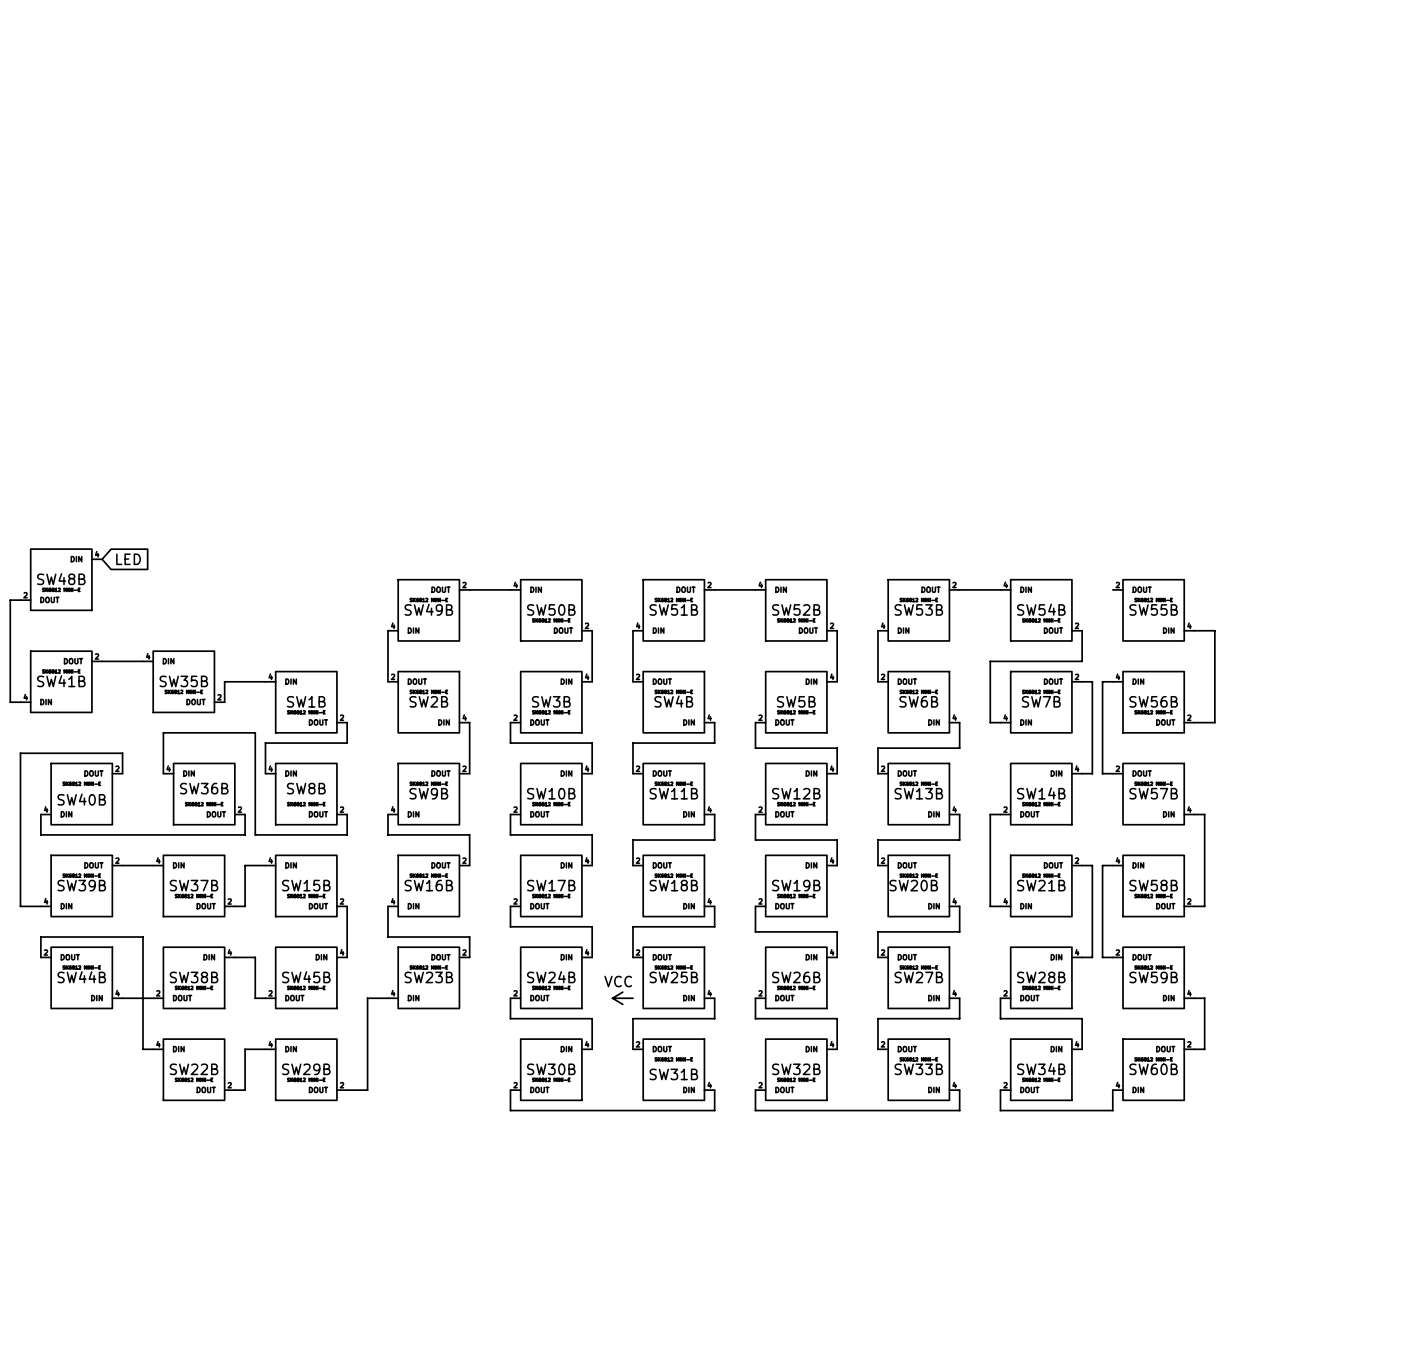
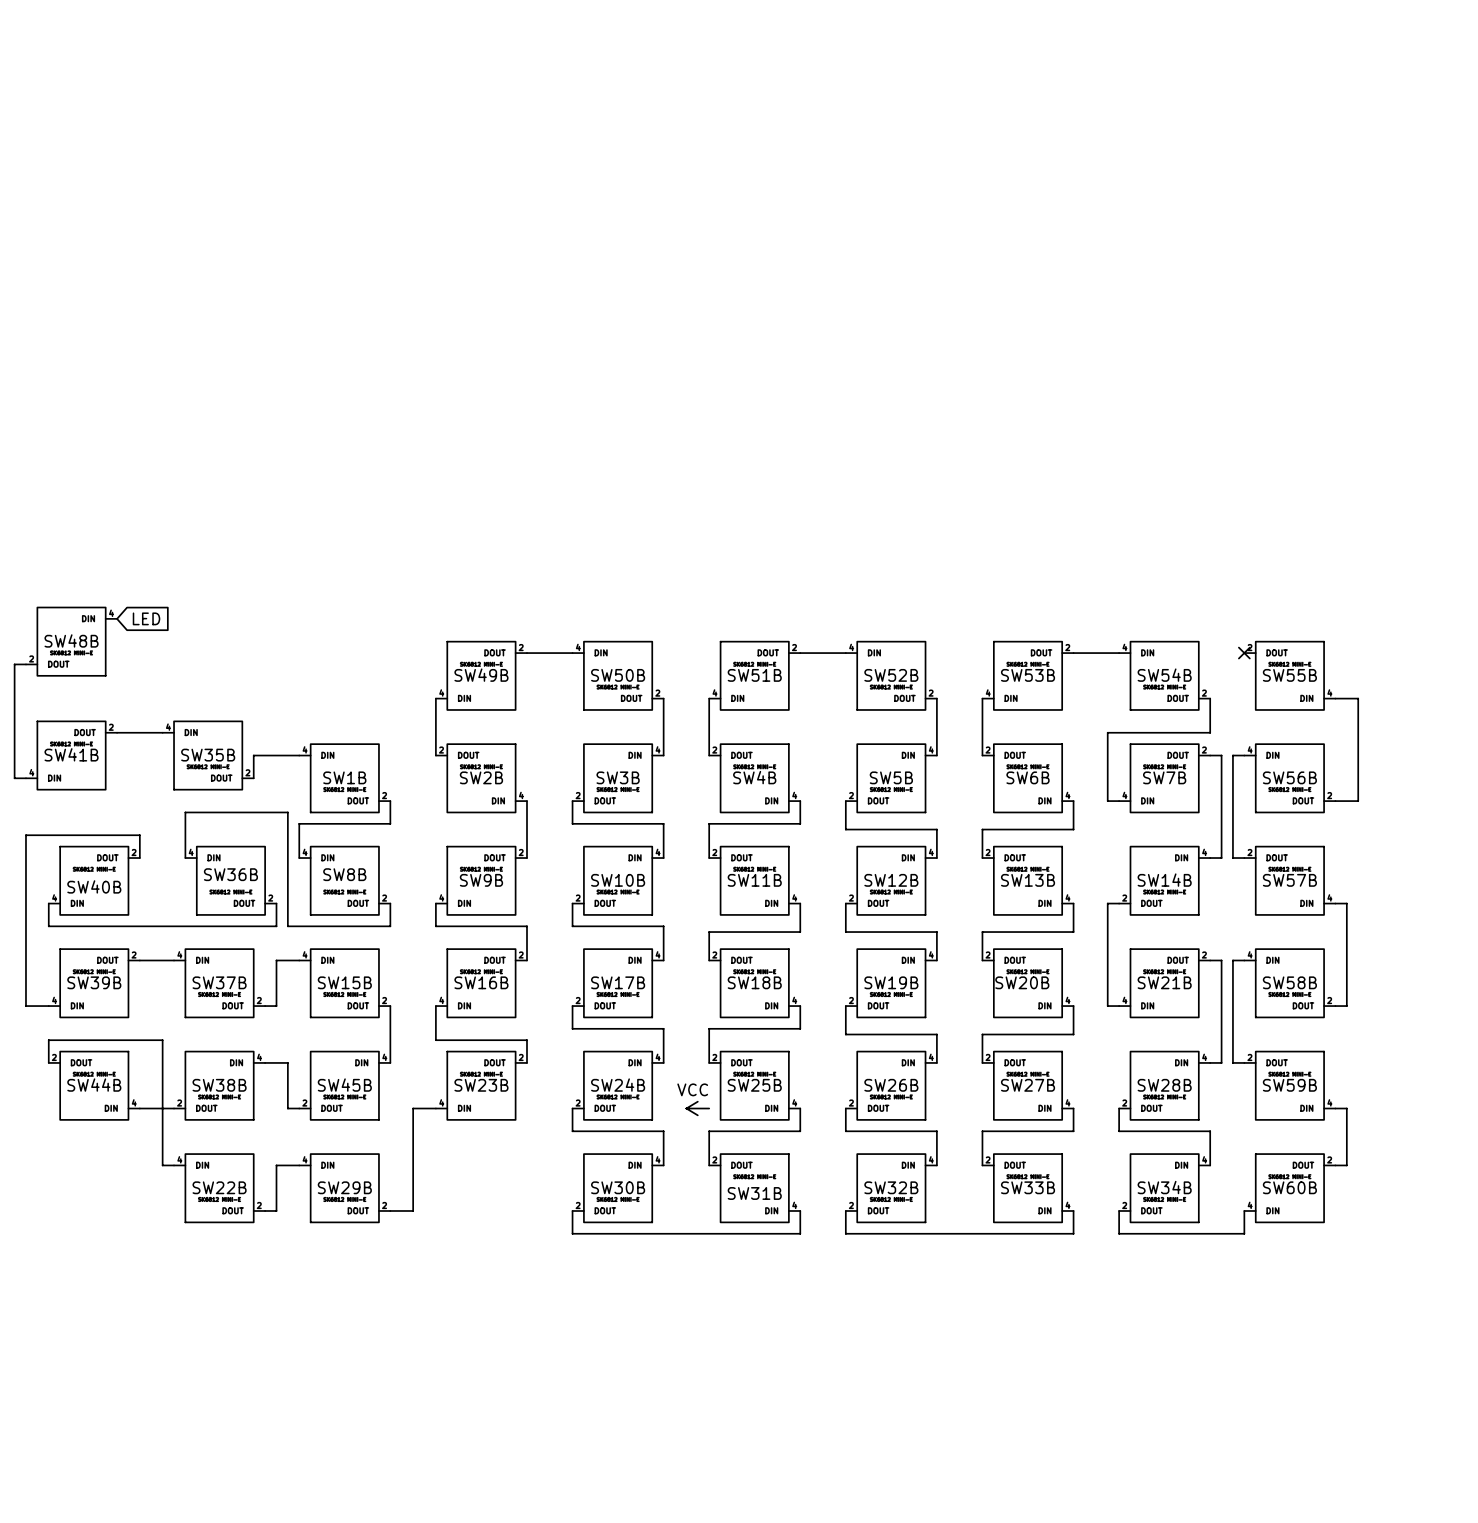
no-connect mark: none -> (1244, 653)

